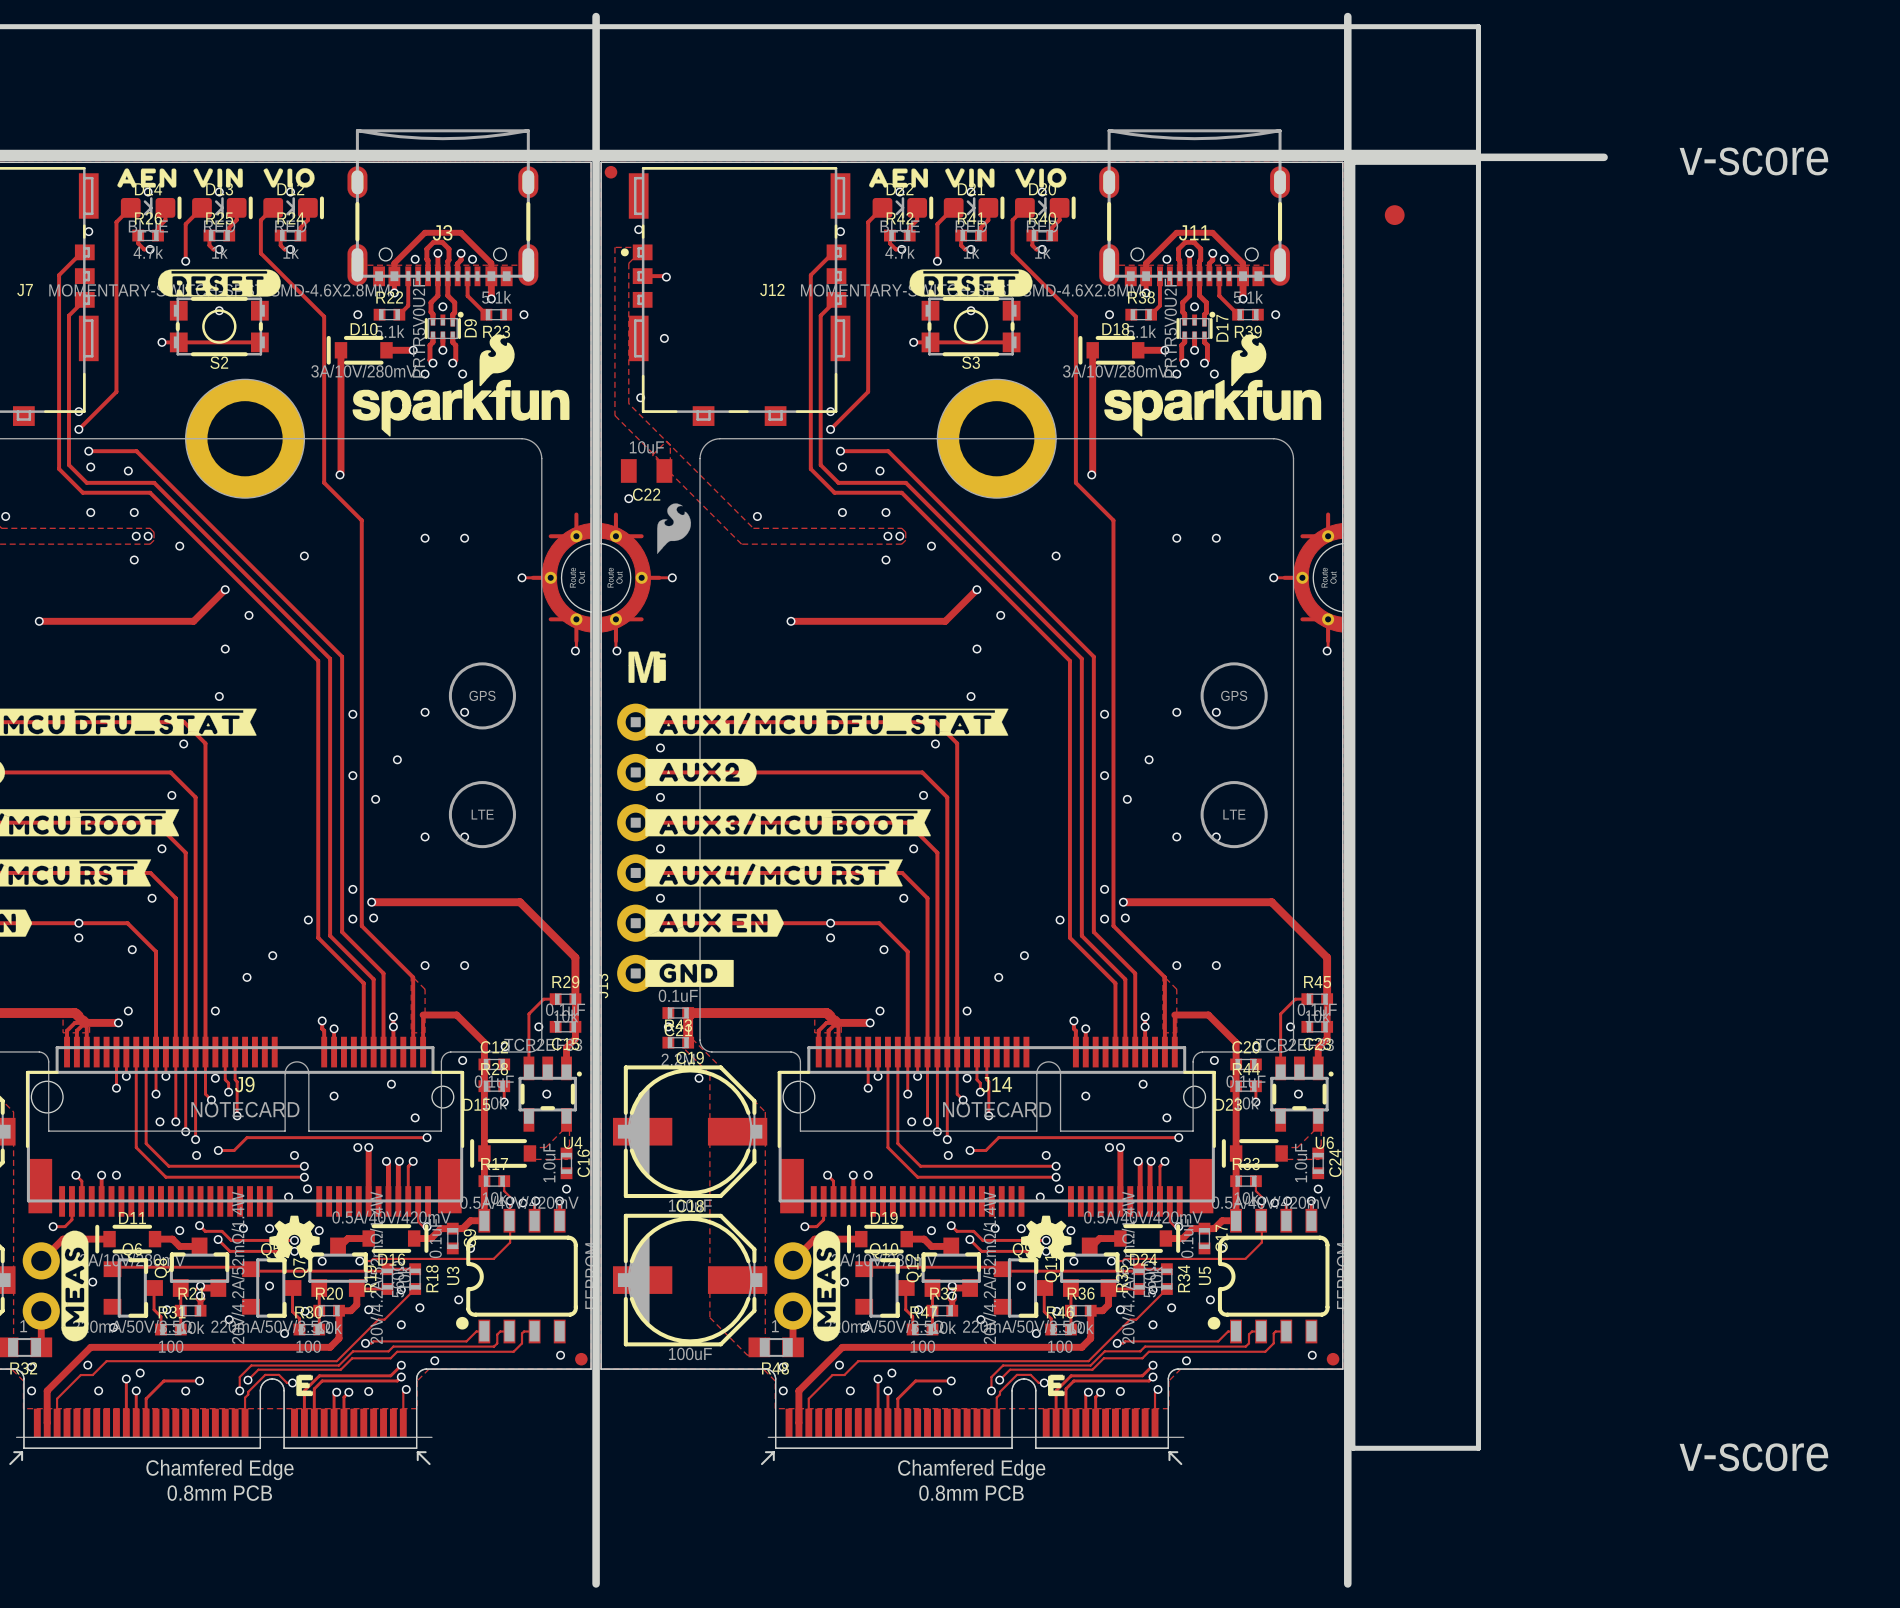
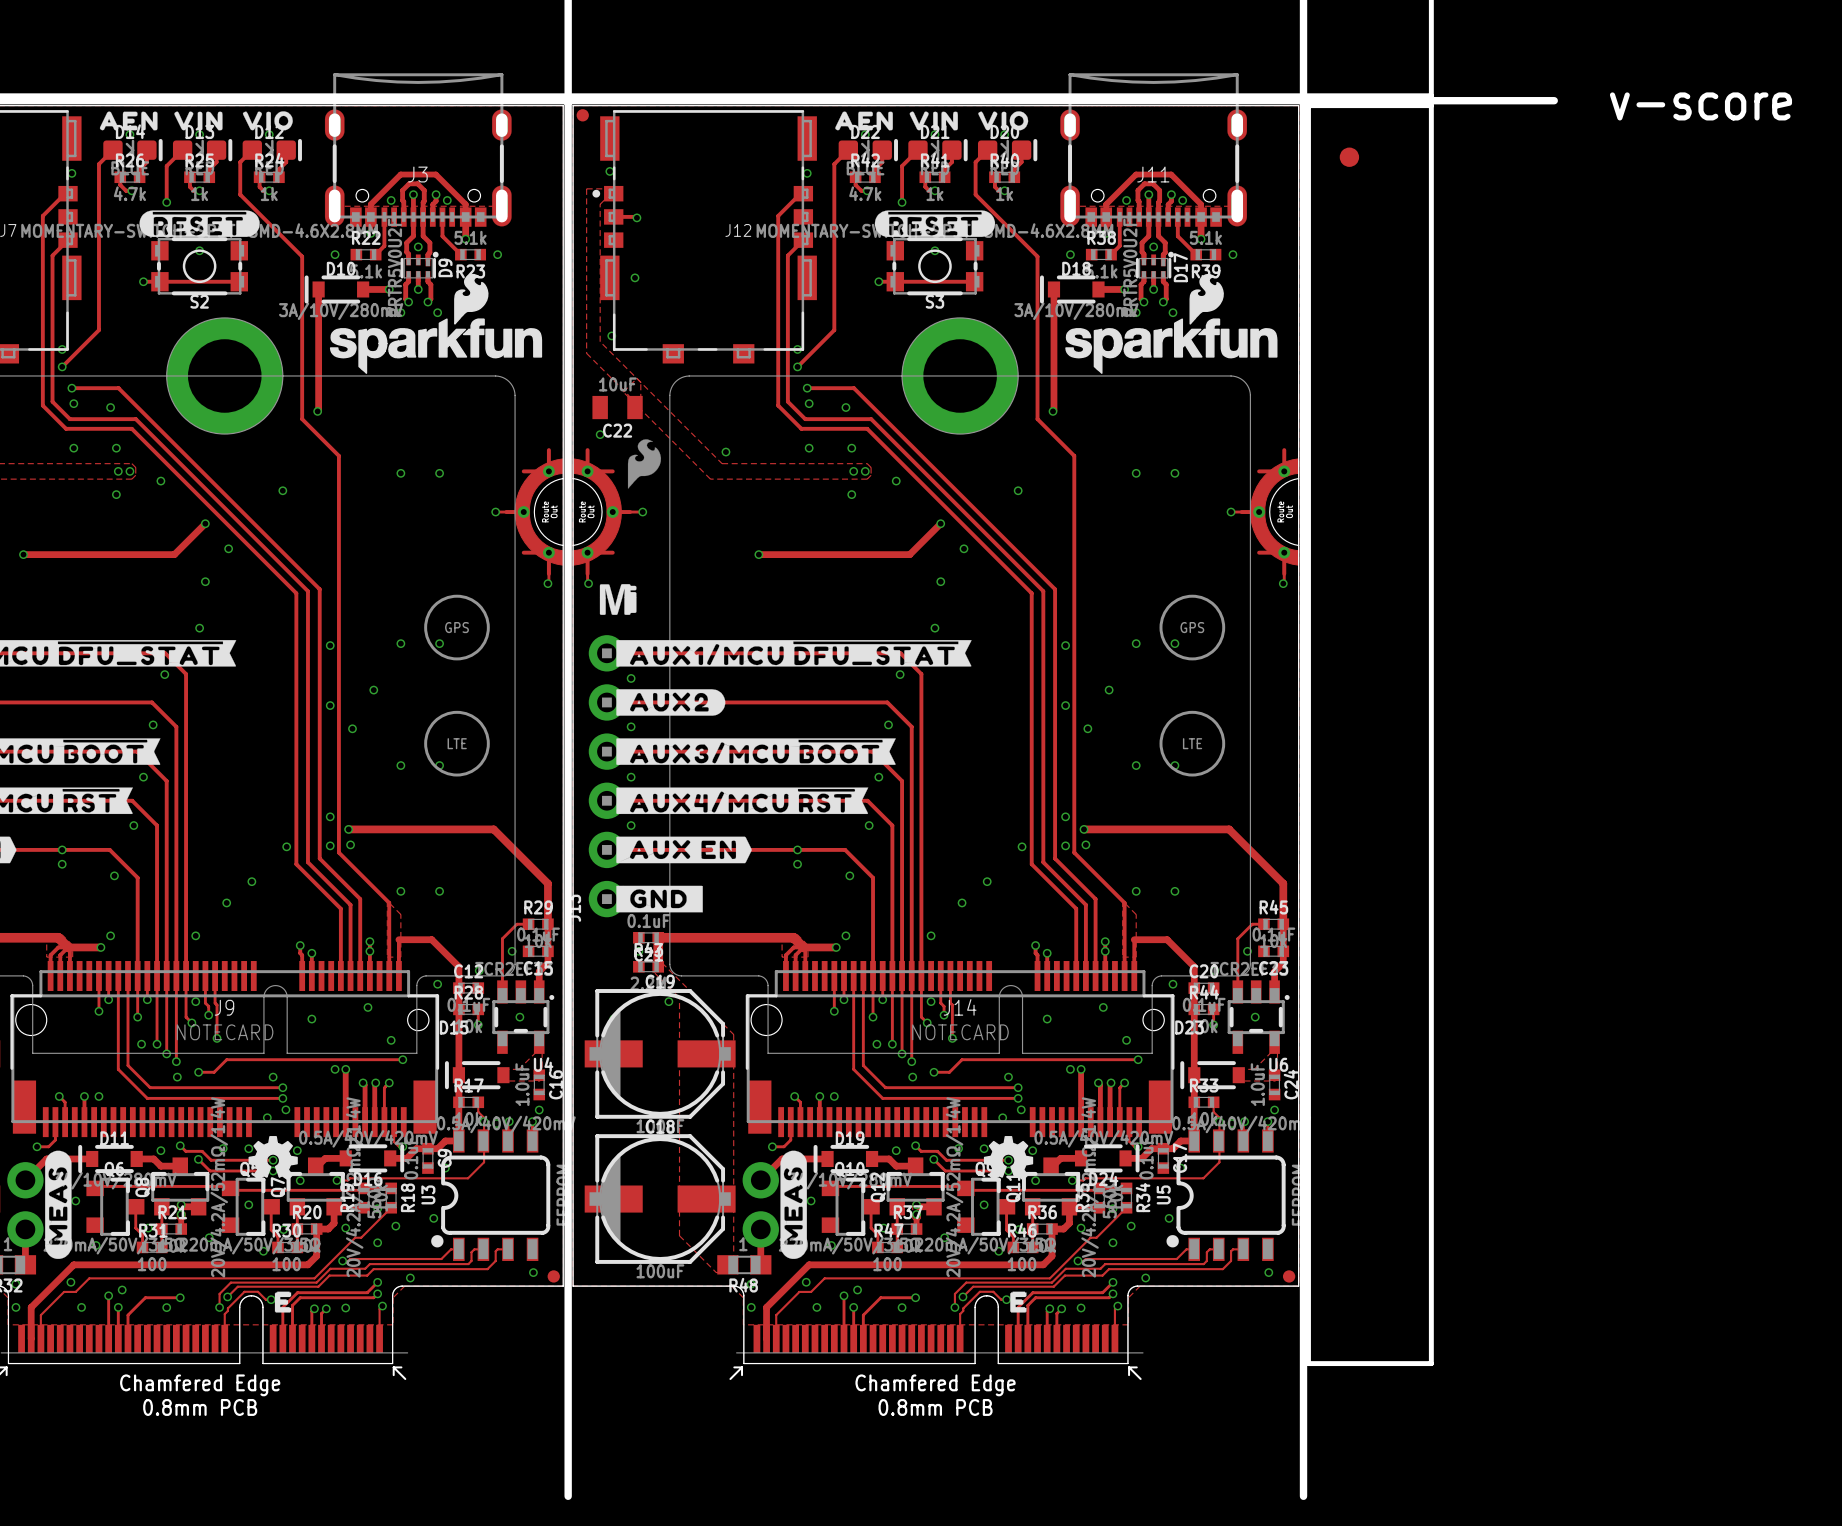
text: v-score (1753, 1457) -> none

